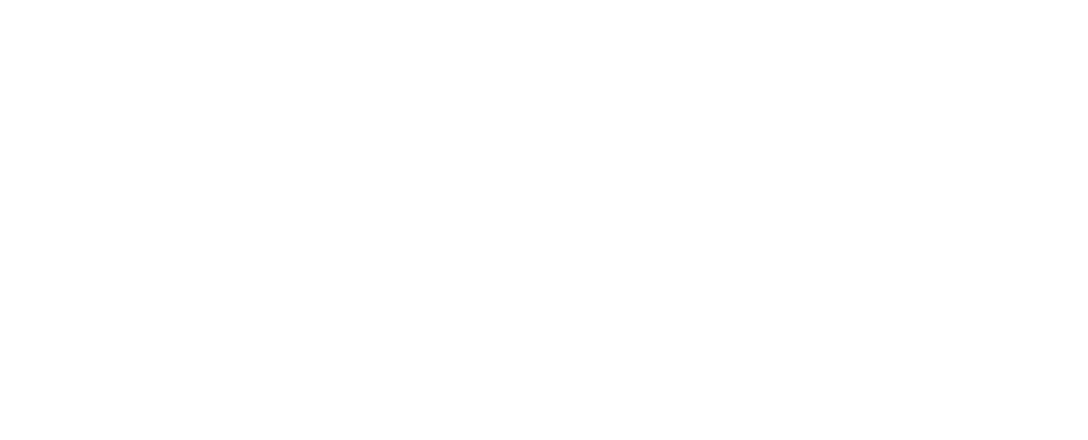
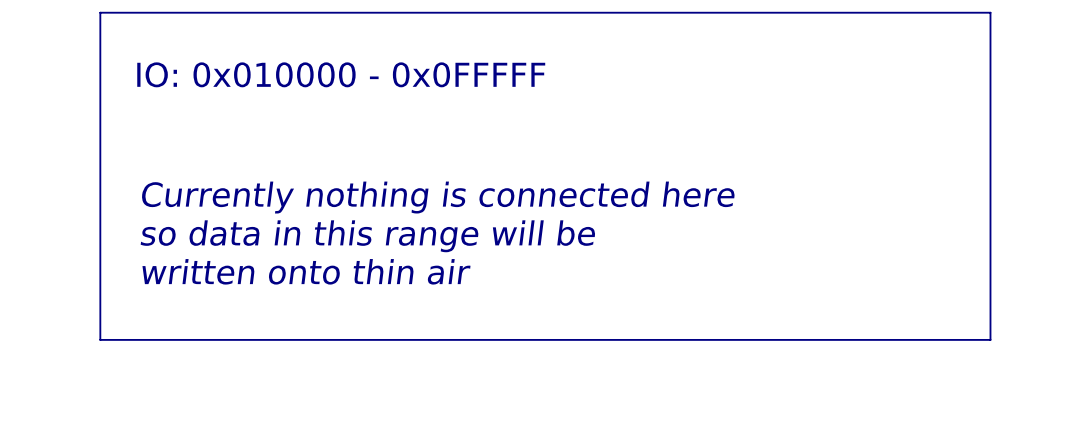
line: none -> (100, 12) (990, 12) (990, 339) (100, 339) (100, 12)
text: none -> IO: 0x010000 - 0x0FFFFF (341, 74)
text: none -> Currently nothing is connected here (438, 197)
text: none -> so data in this range will be (368, 236)
text: none -> written onto thin air (306, 271)

